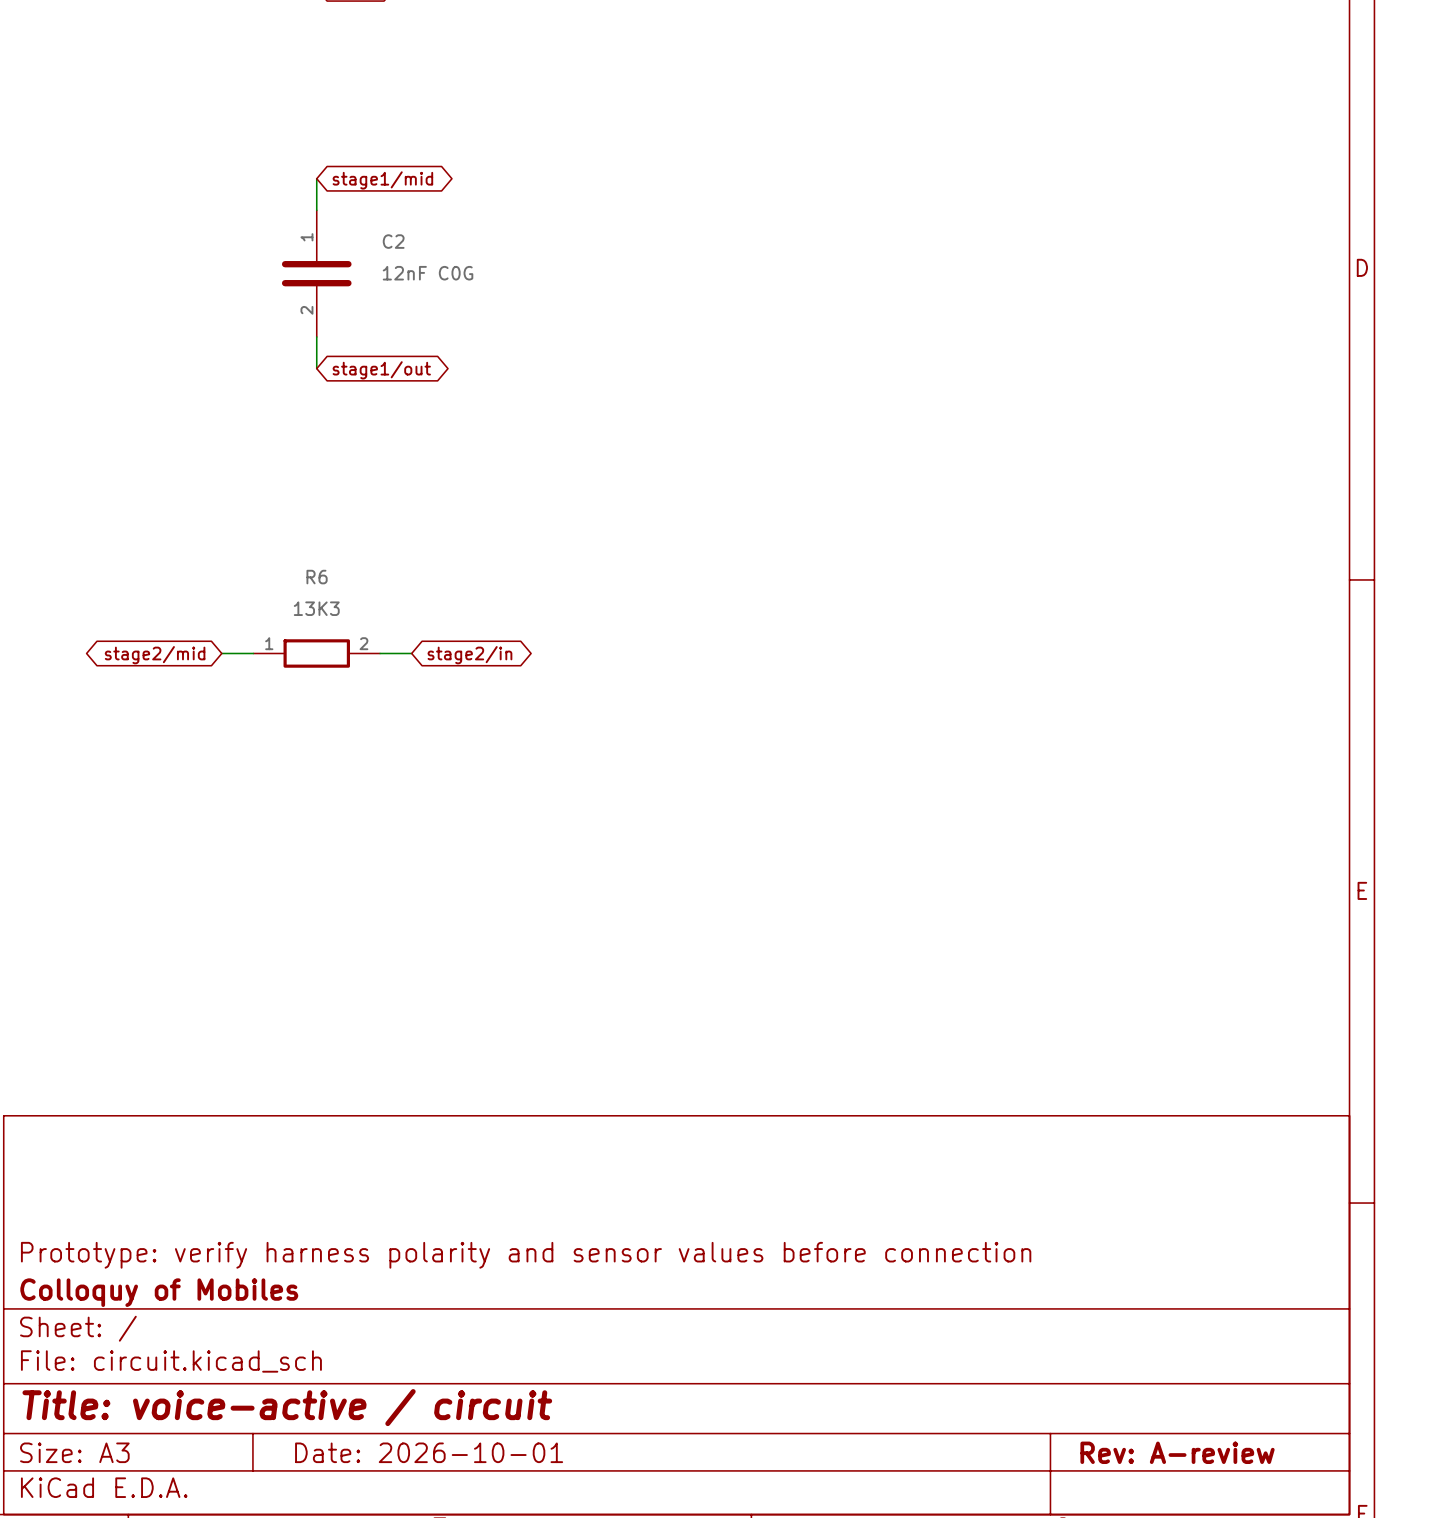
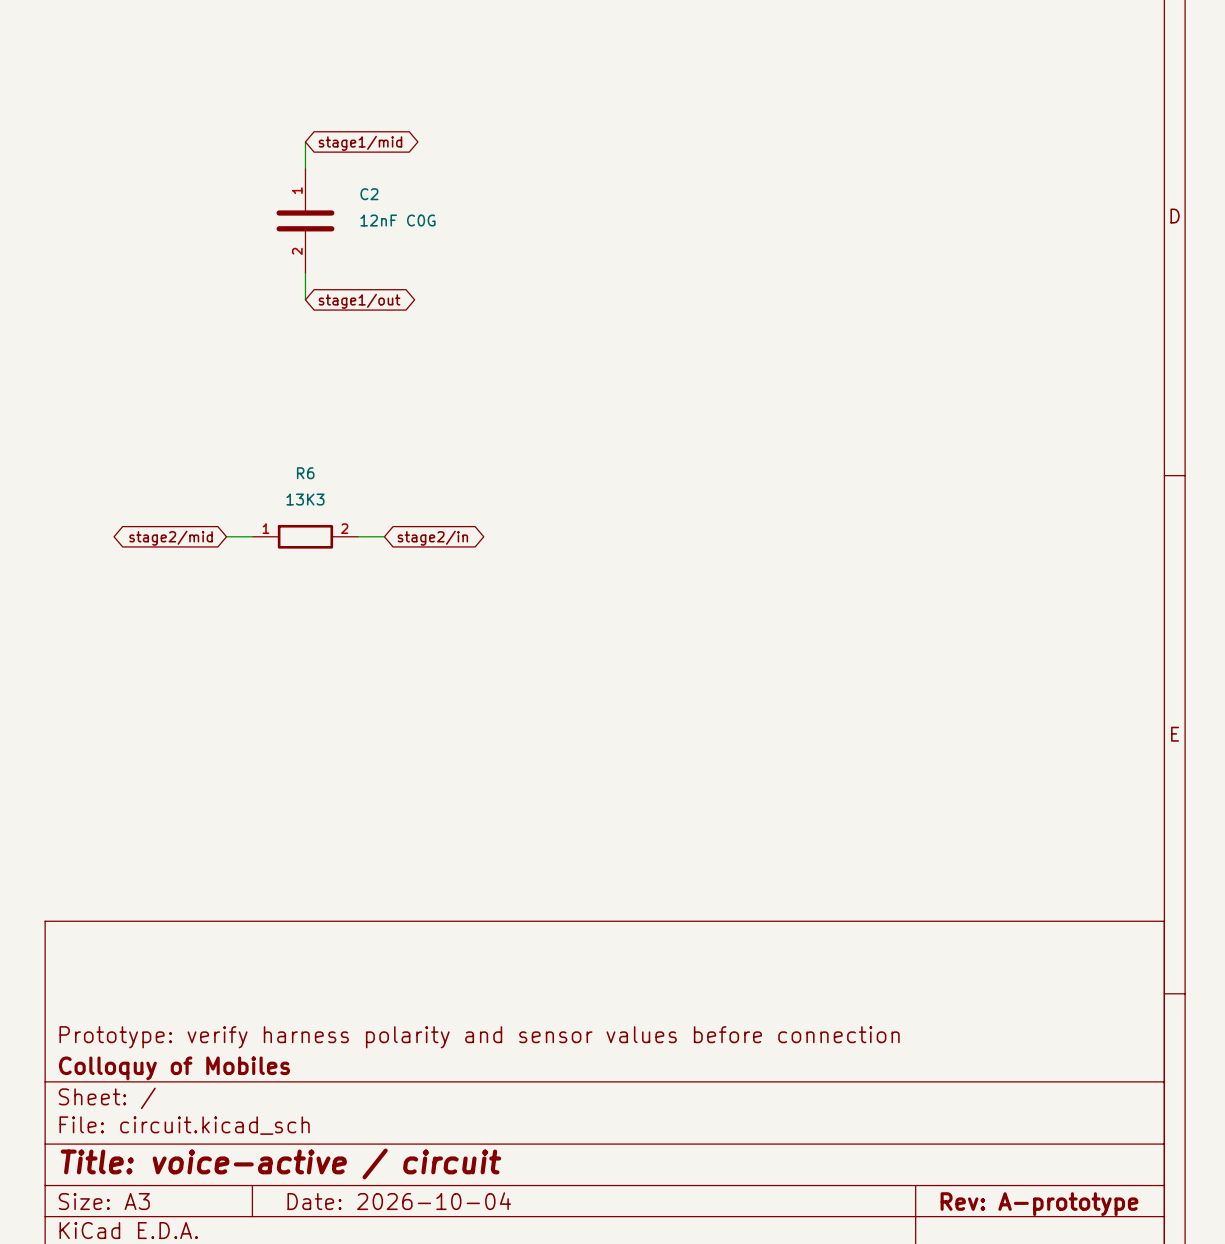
title block: Date: 2026-10-01 (429, 1452) -> Date: 2026-10-04 (399, 1201)
title block: Rev: A-review (1177, 1452) -> Rev: A-prototype (1039, 1204)

